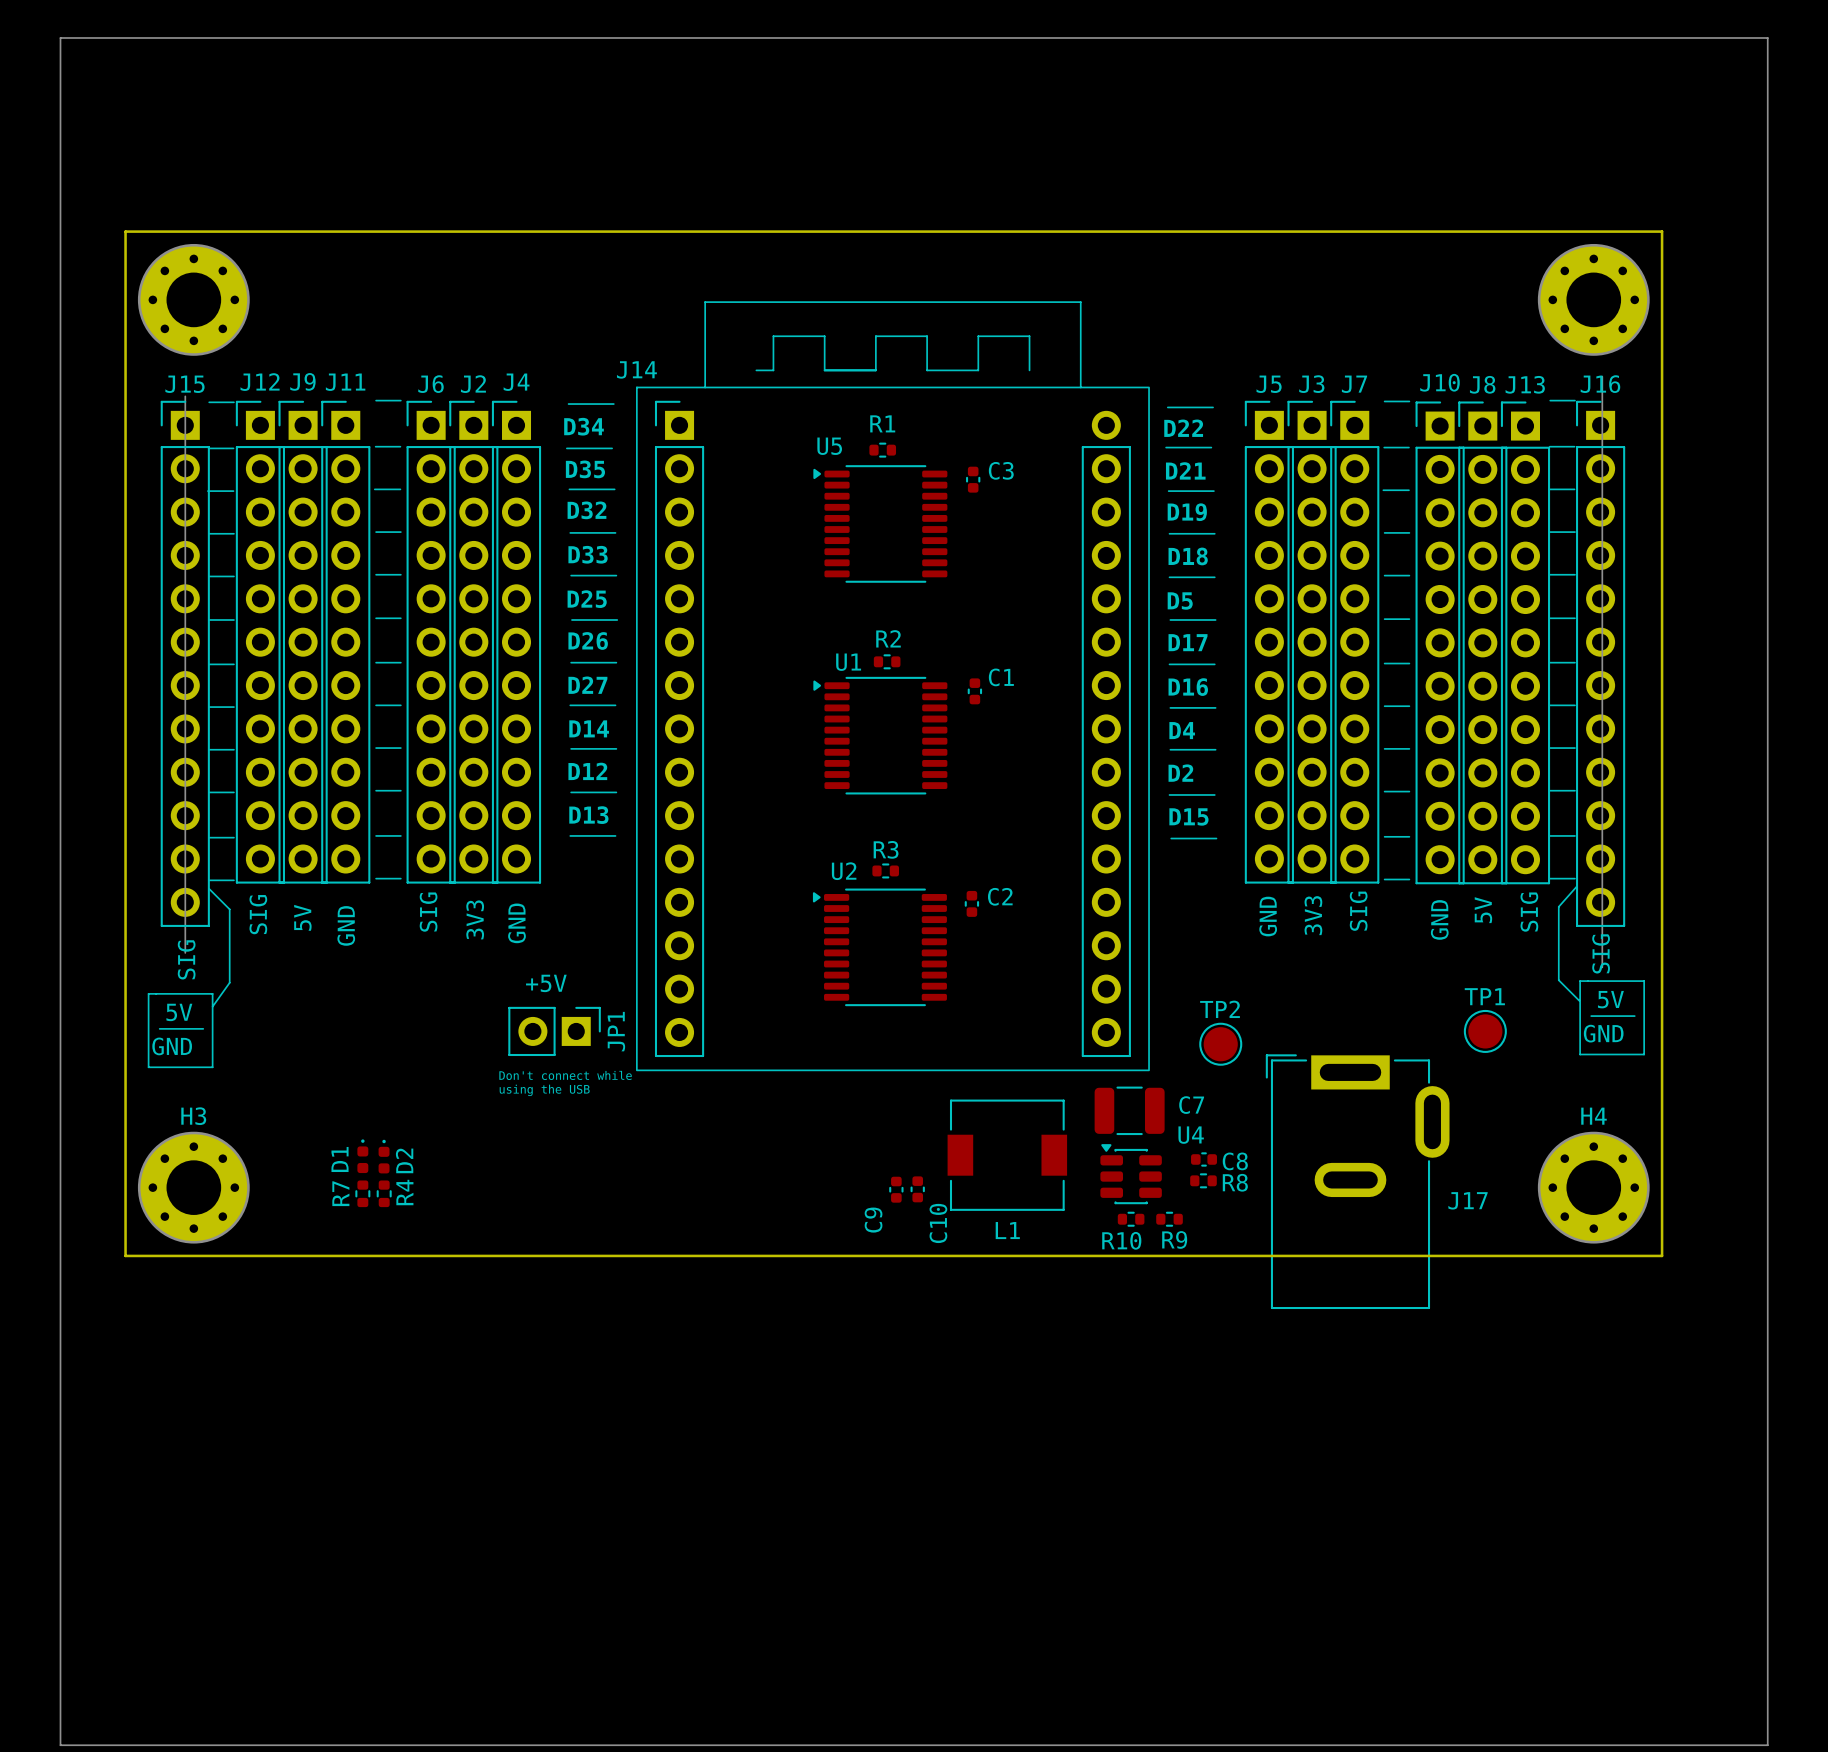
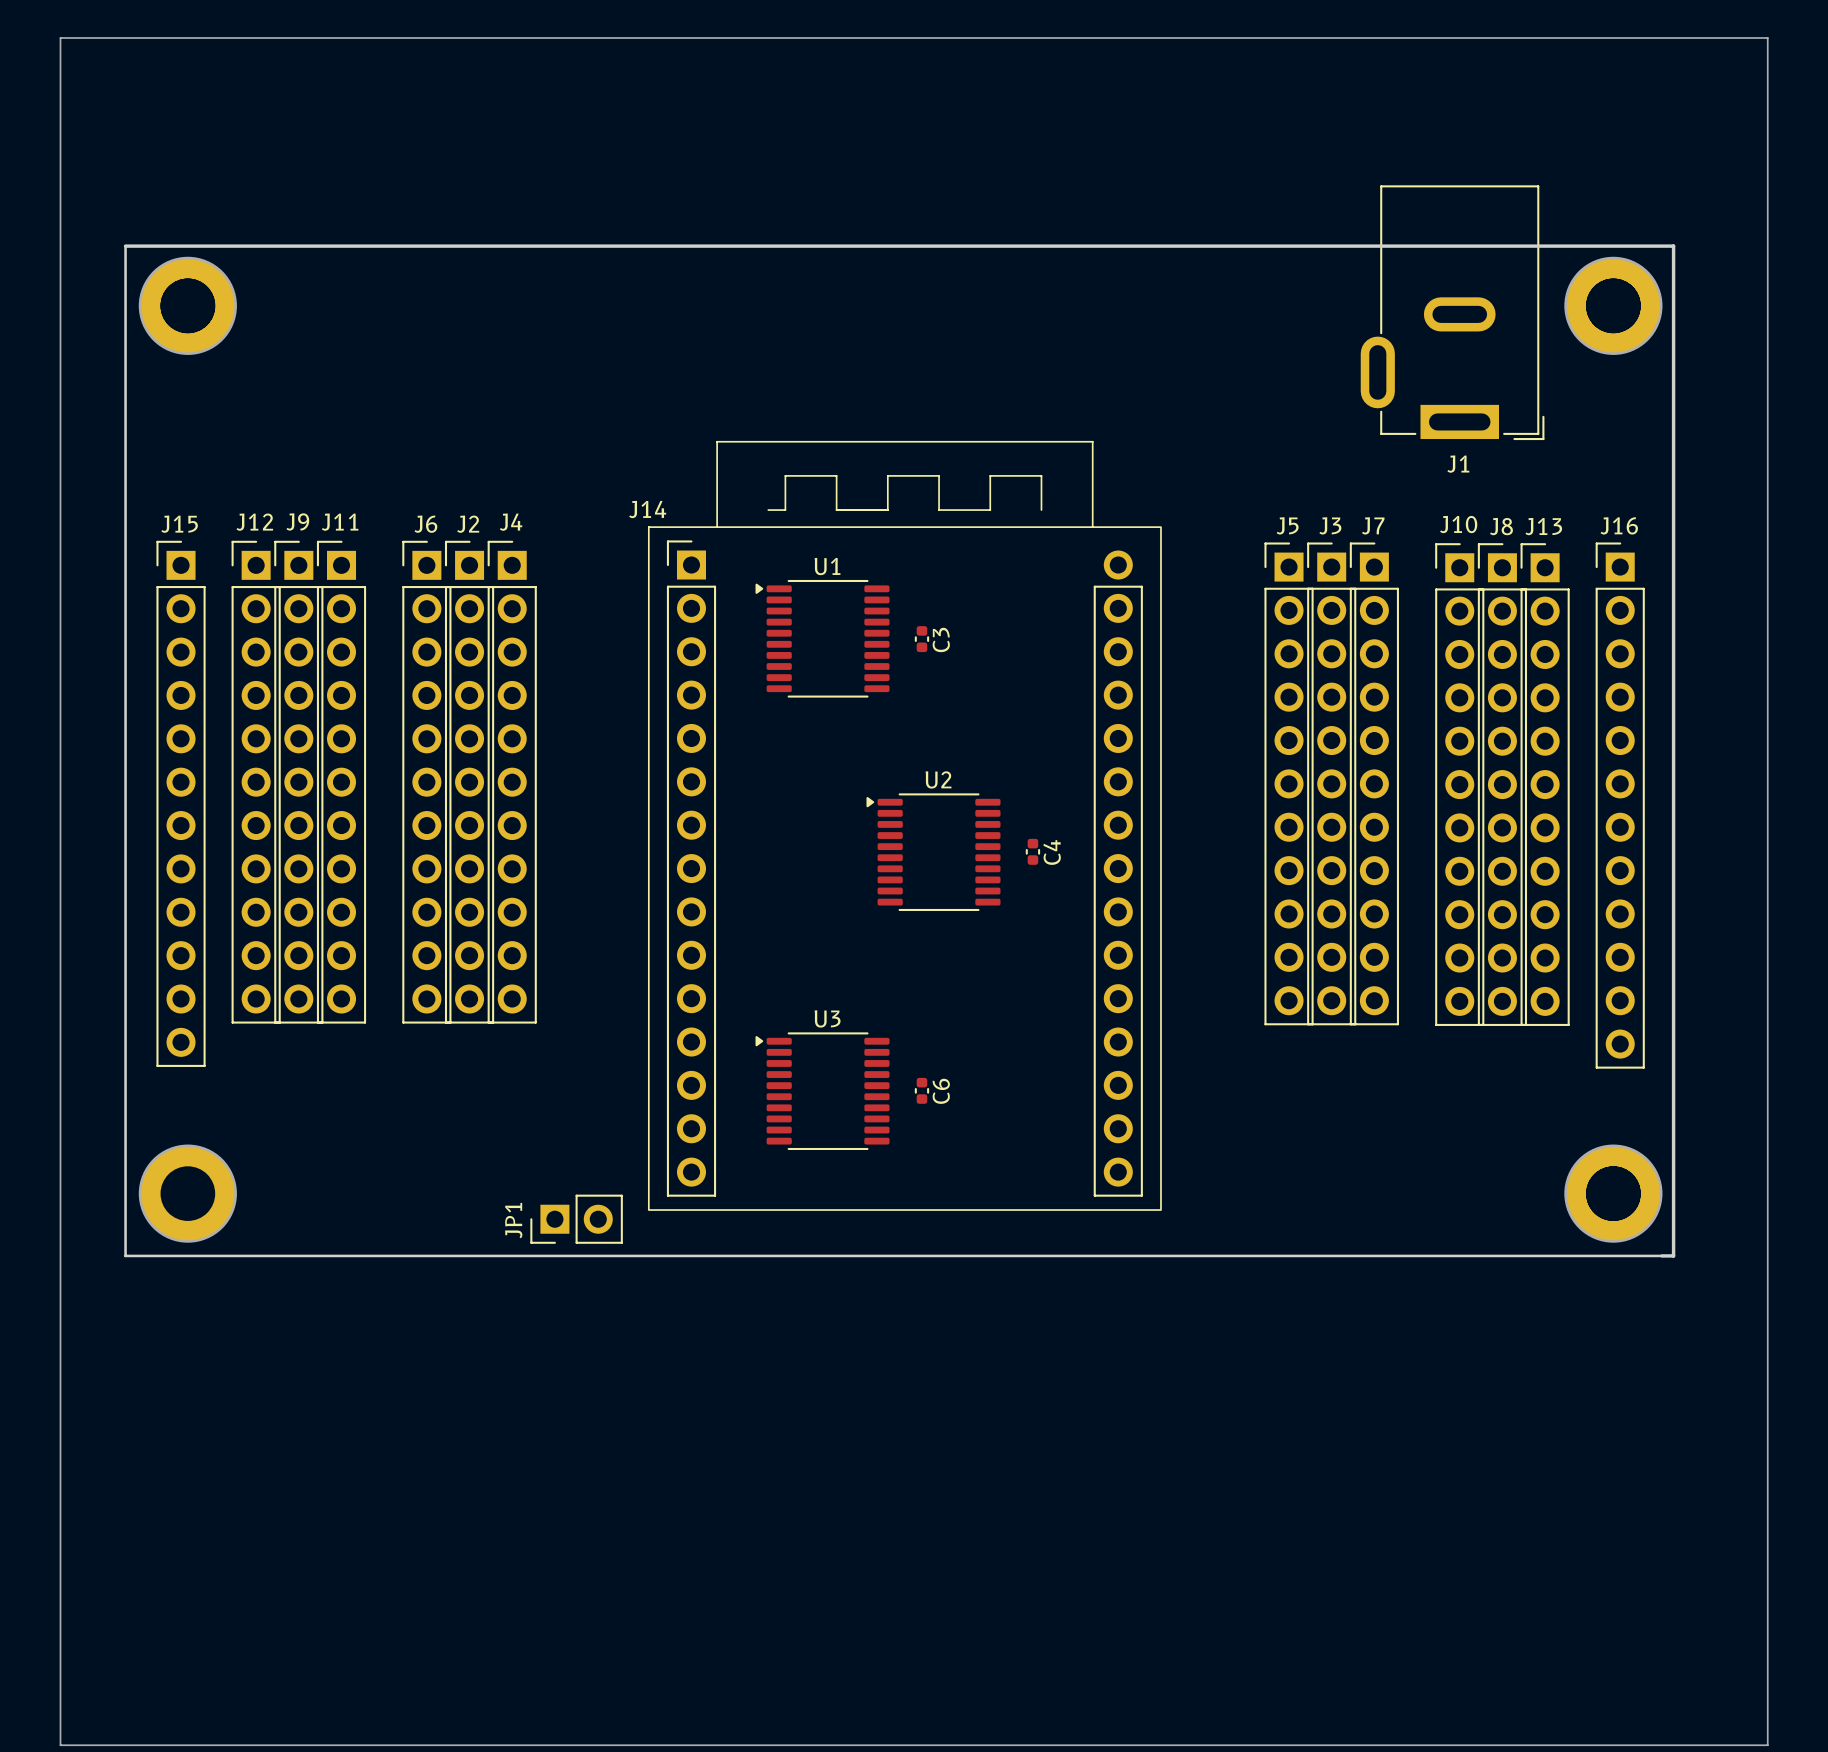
board edge: (125, 246) (125, 231) (1662, 231) (1662, 1255) -> (125, 246) (1673, 246) (1673, 1255) (1662, 1255)
part: (193, 299) -> none
part: (1593, 299) -> none
part: none -> (187, 305)
part: none -> (187, 305)
part: none -> (1613, 305)
part: none -> (1613, 305)
J1: none -> (1452, 312)
line: (1602, 376) (1602, 967) -> none
line: (185, 396) (185, 952) -> none
line: (376, 400) (400, 400) -> none
line: (1550, 400) (1574, 400) -> none
line: (1384, 401) (1409, 401) -> none
line: (209, 402) (233, 402) -> none
line: (568, 404) (613, 404) -> none
line: (1167, 407) (1213, 407) -> none
text: D34 (584, 426) -> none
text: D22 (1183, 428) -> none
line: (375, 446) (400, 446) -> none
line: (1549, 446) (1574, 446) -> none
line: (1166, 447) (1211, 447) -> none
line: (1384, 447) (1408, 447) -> none
line: (208, 448) (233, 448) -> none
line: (566, 448) (612, 448) -> none
R1: (882, 450) -> none
text: D35 (585, 469) -> none
C3 name rotation: 0° (1001, 470) -> 90° counterclockwise (941, 639)
text: D21 (1185, 470) -> none
C3 position: (973, 479) -> (921, 639)
line: (374, 489) (400, 489) -> none
line: (569, 489) (614, 489) -> none
line: (1548, 489) (1574, 489) -> none
line: (1383, 490) (1408, 490) -> none
line: (207, 491) (233, 491) -> none
line: (1168, 491) (1213, 491) -> none
text: D32 (586, 510) -> none
text: D19 (1187, 512) -> none
U5: (880, 523) -> none
line: (376, 532) (400, 532) -> none
line: (570, 532) (615, 532) -> none
line: (1384, 532) (1409, 532) -> none
line: (1550, 532) (1574, 532) -> none
line: (209, 533) (233, 533) -> none
line: (1169, 533) (1214, 533) -> none
text: D33 (588, 554) -> none
text: D18 (1188, 556) -> none
line: (376, 574) (400, 574) -> none
line: (1550, 574) (1574, 574) -> none
line: (571, 575) (616, 575) -> none
line: (1384, 575) (1409, 575) -> none
line: (209, 576) (233, 576) -> none
line: (1169, 577) (1214, 577) -> none
text: D25 (587, 599) -> none
text: D5 (1180, 601) -> none
line: (376, 618) (400, 618) -> none
line: (1550, 618) (1574, 618) -> none
line: (209, 619) (233, 619) -> none
line: (571, 619) (617, 619) -> none
line: (1170, 619) (1215, 619) -> none
line: (1384, 619) (1409, 619) -> none
text: D26 (588, 640) -> none
J12 position: (260, 642) -> (256, 782)
J9 position: (303, 642) -> (298, 782)
J11 position: (345, 642) -> (341, 782)
J6 position: (431, 642) -> (426, 782)
J2 position: (473, 642) -> (469, 782)
J4 position: (516, 642) -> (512, 782)
text: D17 (1188, 642) -> none
J5 position: (1269, 642) -> (1289, 783)
J3 position: (1312, 642) -> (1331, 783)
J7 position: (1354, 642) -> (1374, 783)
J10 position: (1440, 642) -> (1459, 784)
J8 position: (1482, 642) -> (1502, 784)
J13 position: (1525, 642) -> (1545, 784)
R2: (887, 661) -> none
line: (376, 662) (400, 662) -> none
line: (571, 662) (616, 662) -> none
U1 name position: U1 (848, 662) -> U1 (827, 566)
line: (1550, 662) (1574, 662) -> none
J15 position: (185, 663) -> (181, 803)
line: (1384, 663) (1409, 663) -> none
J16 position: (1600, 663) -> (1620, 805)
line: (209, 664) (233, 664) -> none
line: (1169, 664) (1214, 664) -> none
text: D27 (587, 685) -> none
J14 position: (892, 686) -> (904, 825)
text: D16 (1188, 687) -> none
C1: (974, 691) -> none
line: (376, 705) (400, 705) -> none
line: (570, 705) (615, 705) -> none
line: (1550, 705) (1574, 705) -> none
line: (1384, 706) (1409, 706) -> none
line: (209, 707) (233, 707) -> none
line: (1170, 707) (1215, 707) -> none
text: D14 (589, 728) -> none
text: D4 (1182, 730) -> none
U1 position: (880, 735) -> (822, 638)
line: (376, 748) (400, 748) -> none
line: (571, 748) (616, 748) -> none
line: (1384, 748) (1409, 748) -> none
line: (1550, 748) (1574, 748) -> none
line: (209, 749) (233, 749) -> none
line: (1170, 749) (1215, 749) -> none
text: D12 (587, 771) -> none
text: D2 (1180, 773) -> none
line: (376, 790) (400, 790) -> none
line: (1550, 790) (1574, 790) -> none
line: (1384, 791) (1409, 791) -> none
line: (209, 792) (233, 792) -> none
line: (571, 792) (616, 792) -> none
line: (1169, 794) (1214, 794) -> none
text: D13 (588, 815) -> none
text: D15 (1188, 816) -> none
line: (376, 835) (400, 835) -> none
line: (570, 835) (615, 835) -> none
line: (1550, 835) (1574, 835) -> none
line: (1384, 836) (1409, 836) -> none
line: (209, 837) (233, 837) -> none
line: (1171, 838) (1216, 838) -> none
C4: none -> (1032, 851)
R3: (885, 870) -> none
U2 name position: U2 (844, 871) -> U2 (938, 779)
line: (376, 878) (400, 878) -> none
line: (1550, 878) (1574, 878) -> none
line: (1384, 879) (1409, 879) -> none
line: (209, 880) (233, 880) -> none
line: (1577, 886) (1558, 906) (1558, 980) (1579, 1000) -> none
line: (209, 888) (229, 909) (229, 982) (212, 1006) -> none
C2: (971, 903) -> none
text: 5V (1483, 910) -> none
text: SIG (1358, 911) -> none
text: SIG (428, 912) -> none
text: SIG (1529, 912) -> none
text: SIG (258, 914) -> none
text: 3V3 (1313, 915) -> none
text: GND (1268, 916) -> none
text: 5V (302, 917) -> none
text: 3V3 (475, 919) -> none
text: GND (1439, 919) -> none
text: GND (516, 923) -> none
text: GND (346, 925) -> none
U2 position: (879, 947) -> (933, 852)
text: SIG (1601, 953) -> none
text: SIG (186, 959) -> none
line: (1580, 981) (1644, 981) (1644, 1054) (1580, 1054) (1580, 981) -> none
text: +5V (546, 983) -> none
line: (148, 993) (212, 993) (212, 1067) (148, 1067) (148, 993) -> none
text: 5V (1610, 999) -> none
text: 5V (179, 1012) -> none
line: (1591, 1016) (1634, 1016) -> none
line: (159, 1028) (203, 1028) -> none
JP1 rotation: 0° (554, 1031) -> 180° (576, 1219)
JP1 position: (554, 1031) -> (576, 1219)
TP1: (1485, 1031) -> none
text: GND (1603, 1033) -> none
TP2: (1220, 1044) -> none
text: GND (172, 1046) -> none
text: Don't connect while (565, 1075) -> none
text: using the USB (544, 1090) -> none
C6: none -> (921, 1090)
U3: none -> (822, 1091)
C7: (1129, 1110) -> none
L1: (1007, 1155) -> none
D1: (362, 1156) -> none
D2: (384, 1156) -> none
C8: (1204, 1159) -> none
U4: (1131, 1174) -> none
R8: (1203, 1180) -> none
J17: (1357, 1181) -> none
H3: (193, 1187) -> none
H4: (1593, 1187) -> none
C9: (896, 1189) -> none
C10: (917, 1189) -> none
part: none -> (187, 1193)
R7: (362, 1193) -> none
R4: (384, 1193) -> none
part: none -> (1613, 1193)
part: none -> (1613, 1193)
R10: (1131, 1219) -> none
R9: (1169, 1219) -> none

